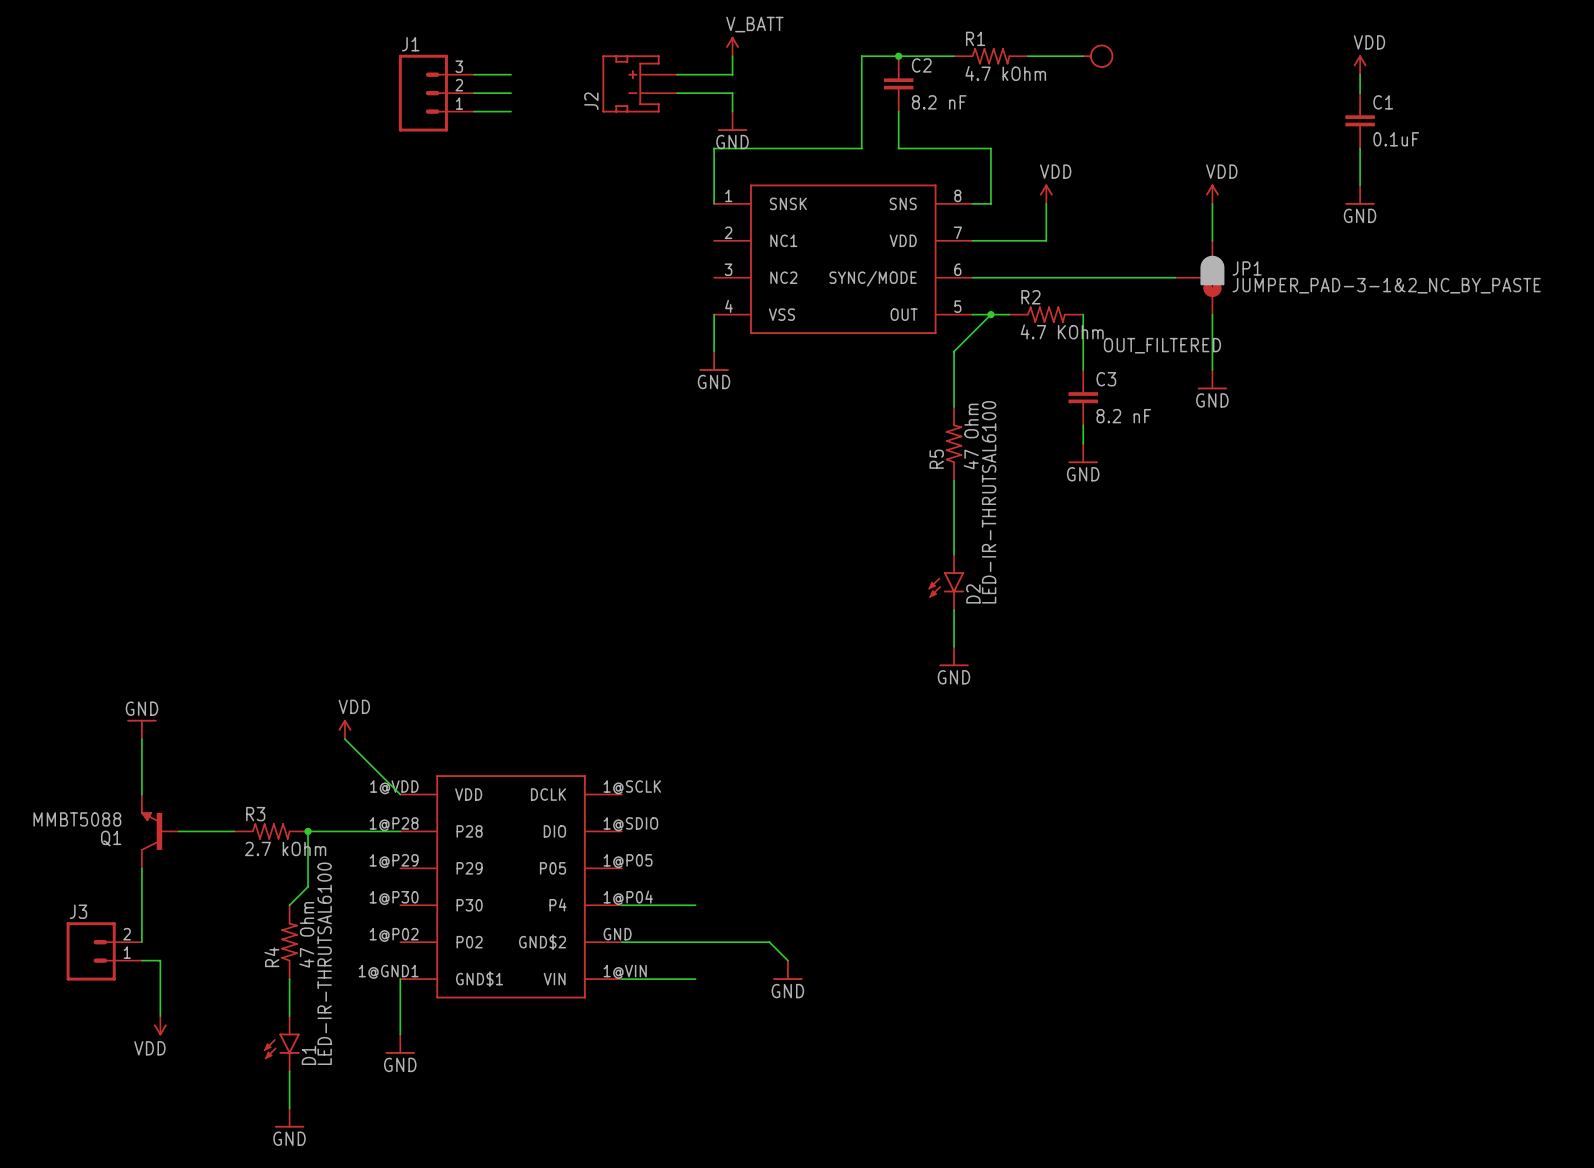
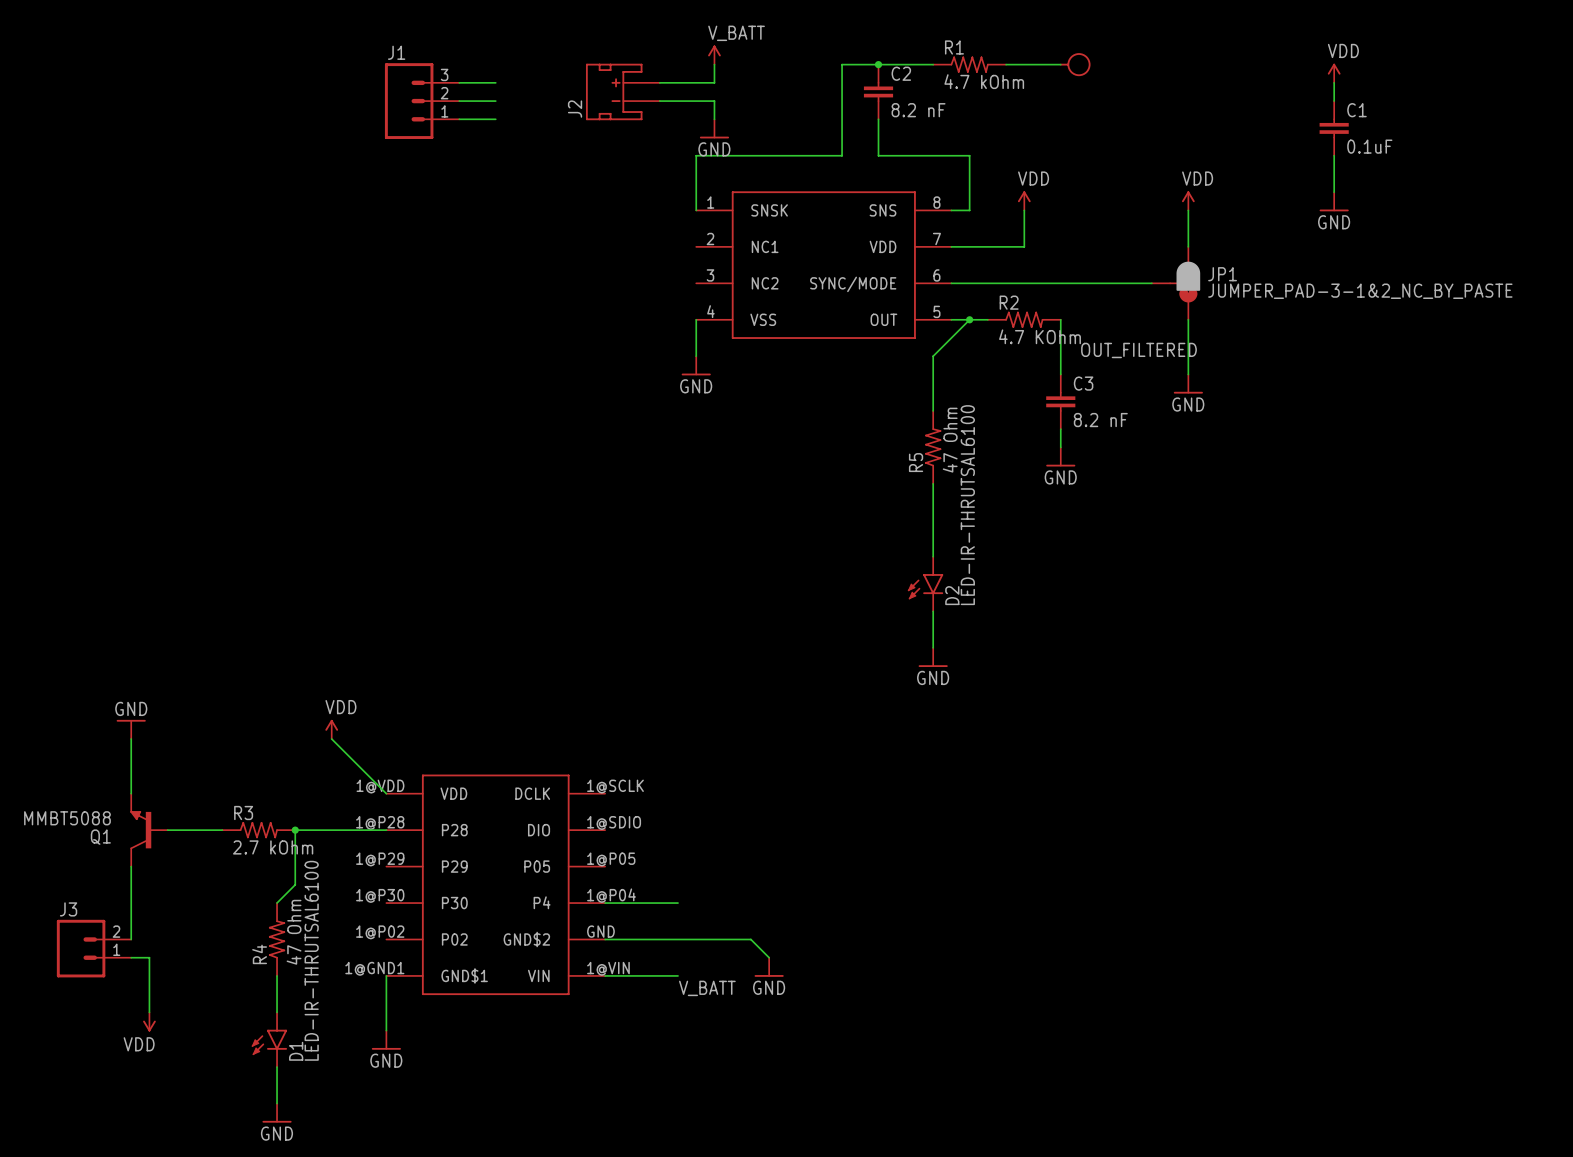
label: none -> V_BATT (707, 988)

